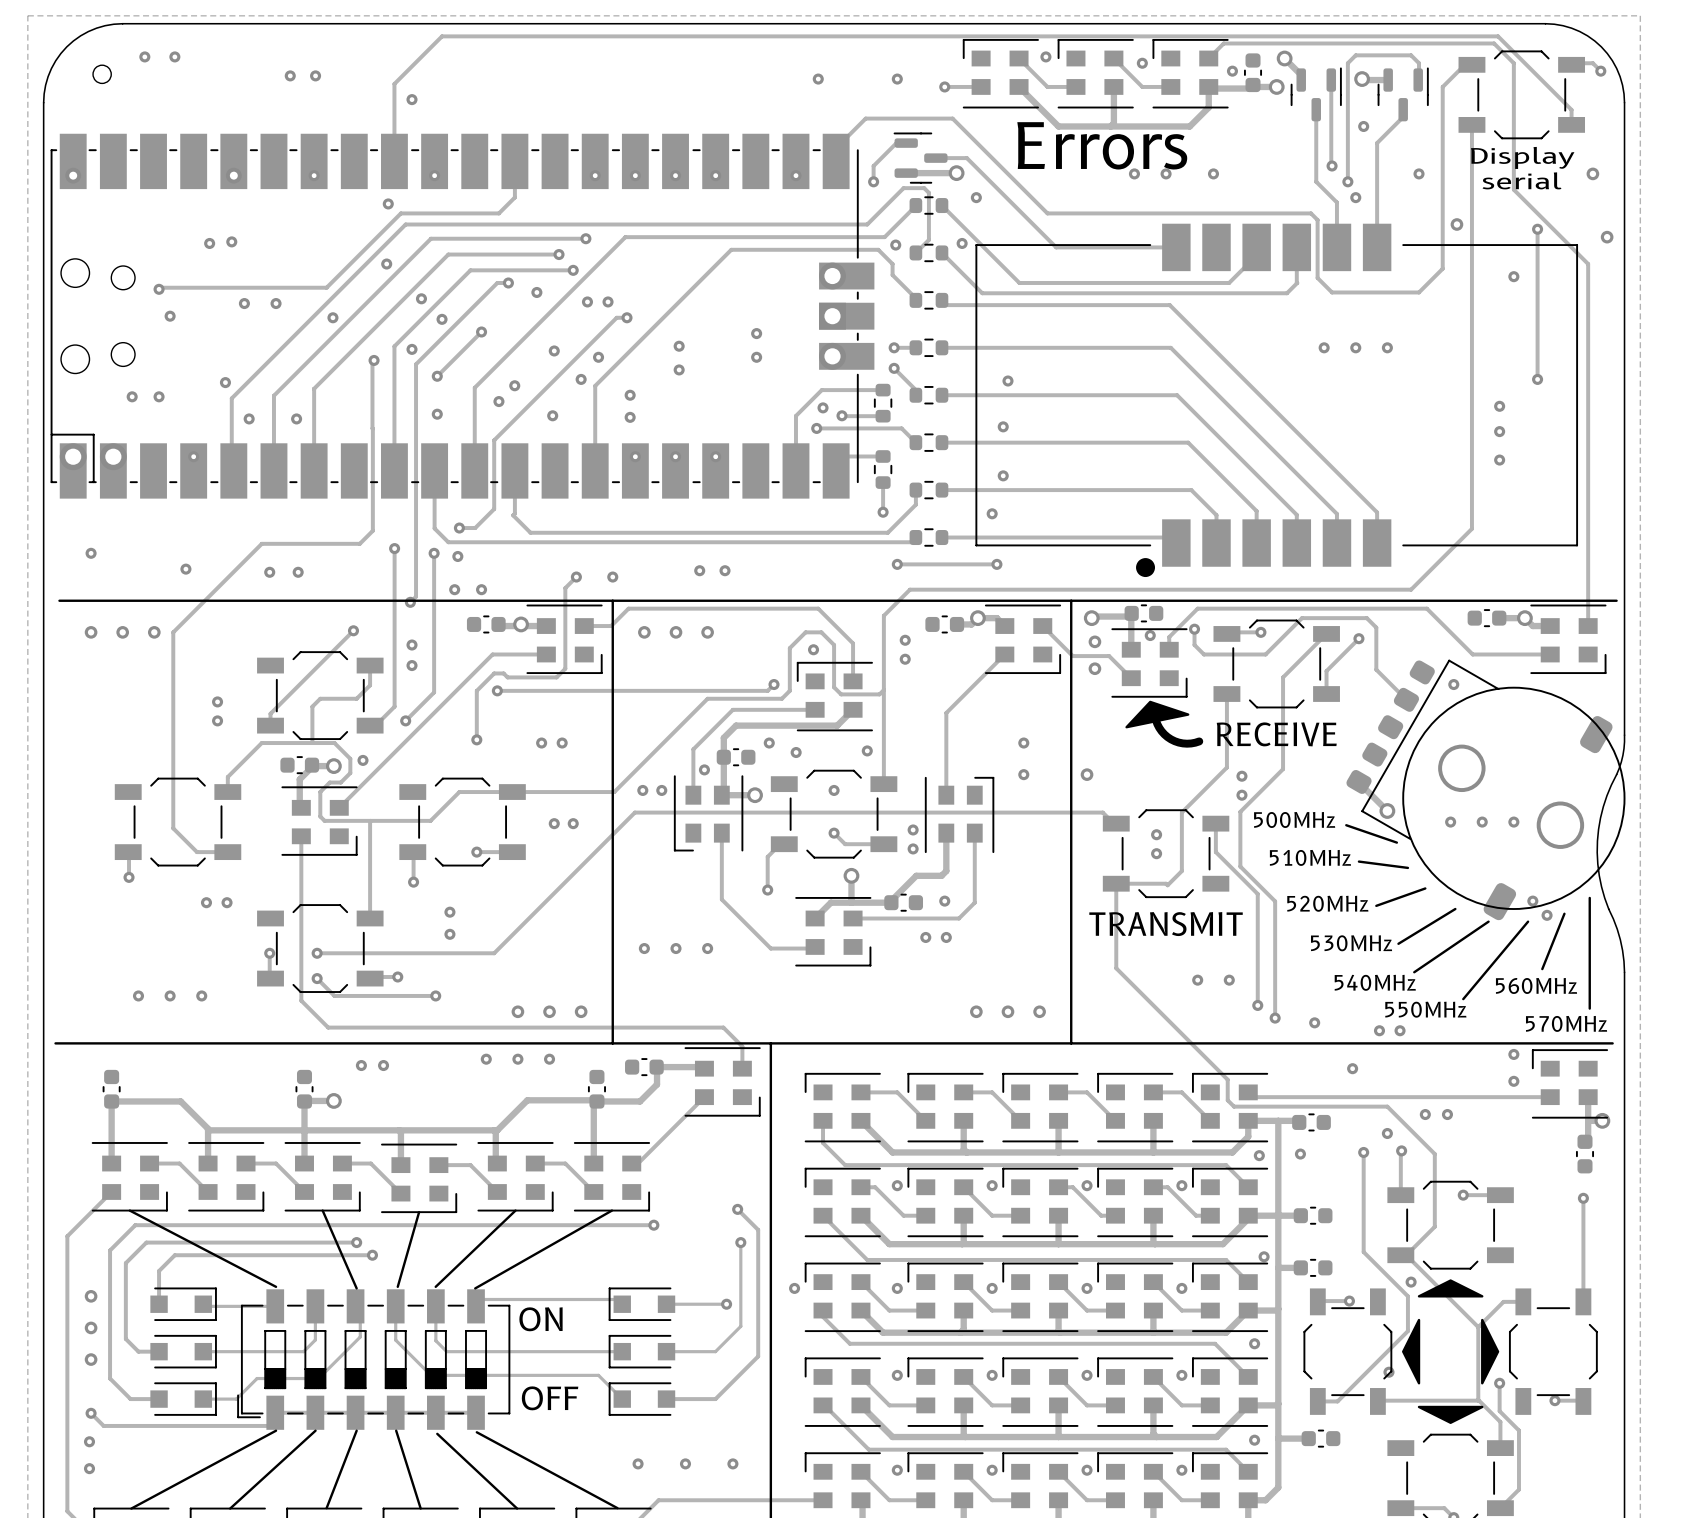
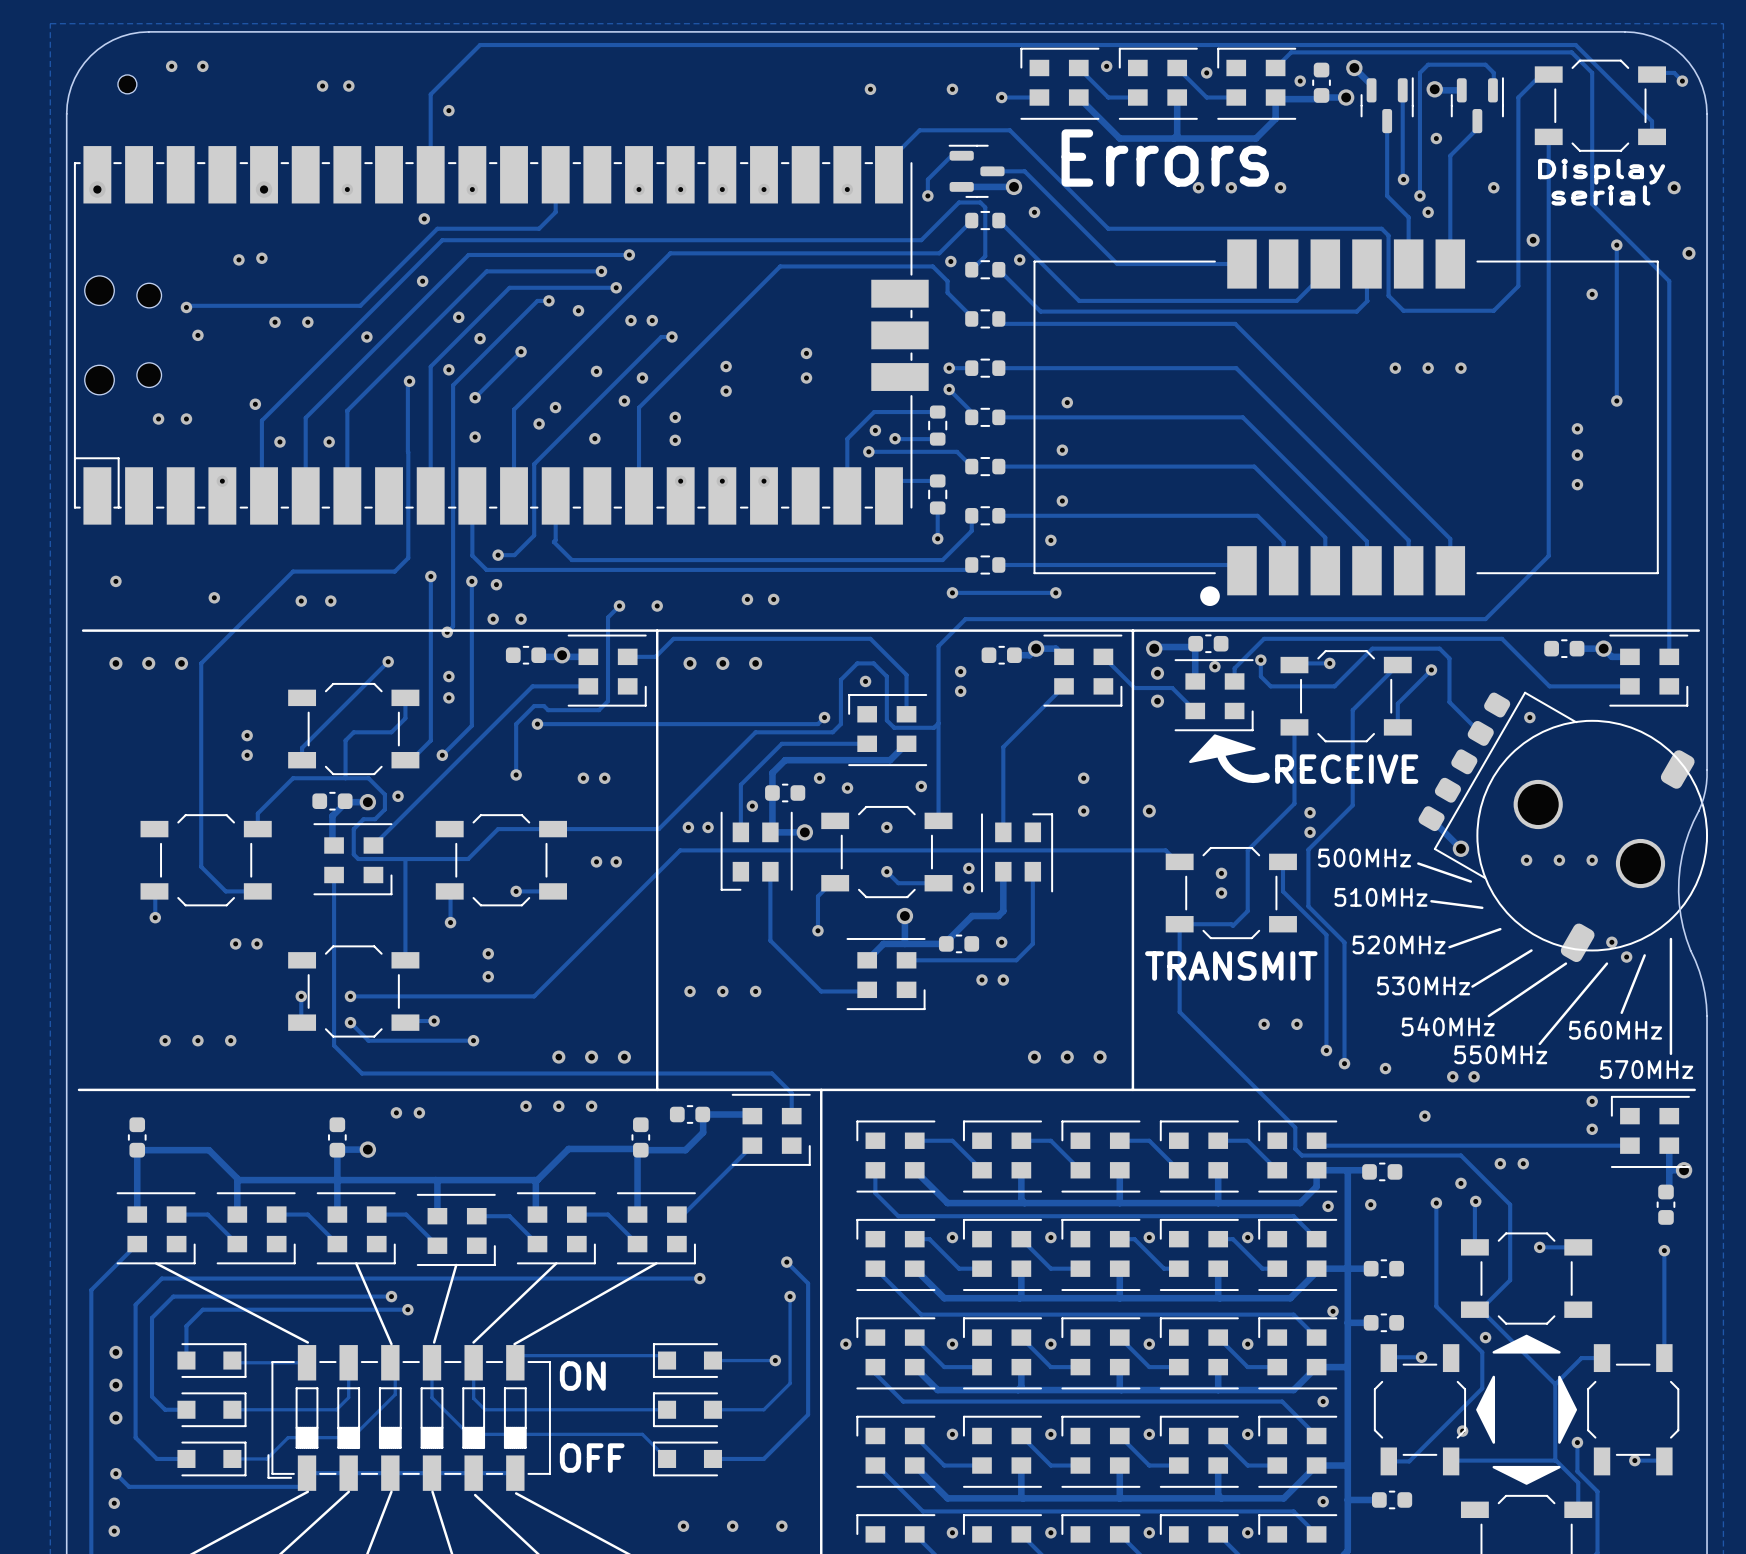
part footprint: [50, 133, 875, 499] -> [73, 146, 929, 525]

